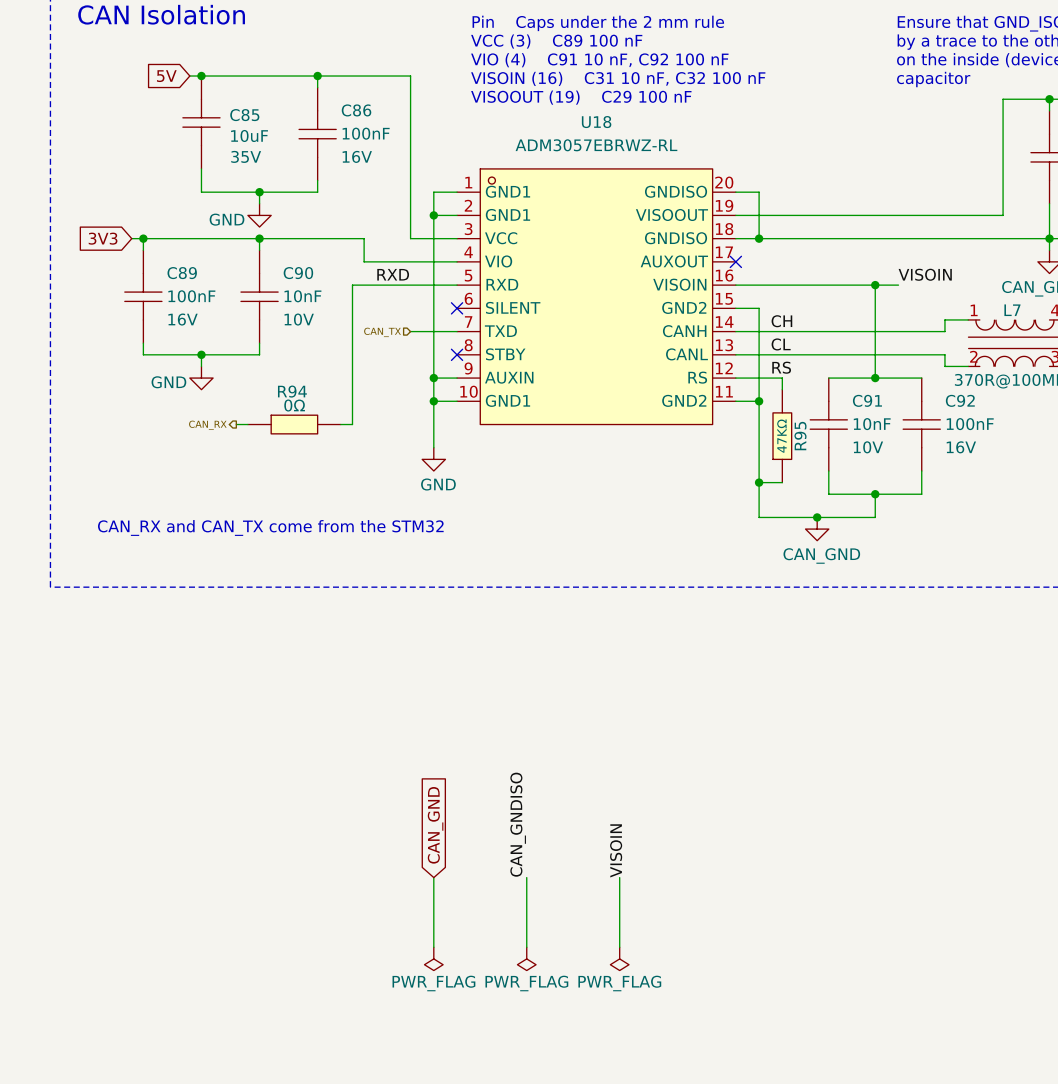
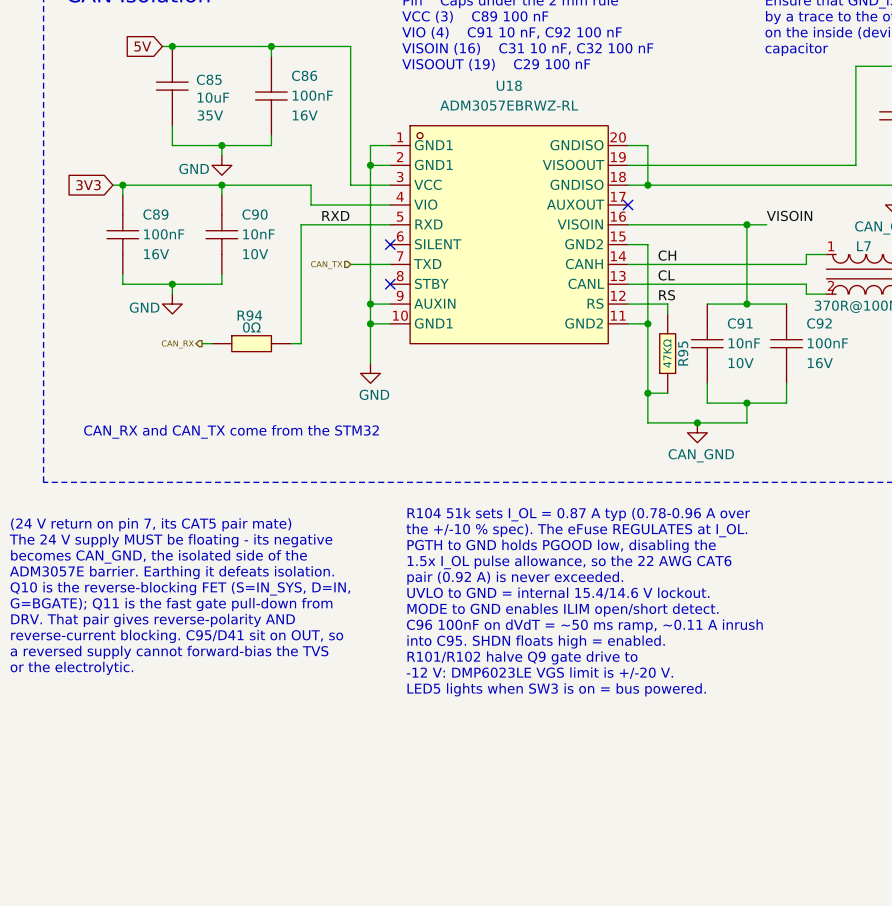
text: none -> R104 51k sets I_OL = 0.87 A typ (0.78-0.96 A over (578, 514)
text: none -> (24 V return on pin 7, its CAT5 pair mate) (151, 524)
text: none -> the +/-10 % spec). The eFuse REGULATES at I_OL. (576, 530)
text: none -> The 24 V supply MUST be floating - its negative (171, 540)
text: none -> PGTH to GND holds PGOOD low, disabling the (561, 546)
text: none -> becomes CAN_GND, the isolated side of the (158, 556)
text: none -> 1.5x I_OL pulse allowance, so the 22 AWG CAT6 (569, 562)
text: none -> ADM3057E barrier. Earthing it defeats isolation. (171, 572)
text: none -> pair (0.92 A) is never exceeded. (515, 578)
text: none -> Q10 is the reverse-blocking FET (S=IN_SYS, D=IN, (180, 588)
text: none -> UVLO to GND = internal 15.4/14.6 V lockout. (558, 593)
text: none -> G=BGATE); Q11 is the fast gate pull-down from (171, 604)
text: none -> MODE to GND enables ILIM open/short detect. (562, 610)
text: none -> DRV. That pair gives reverse-polarity AND (153, 620)
text: none -> C96 100nF on dVdT = ~50 ms ramp, ~0.11 A inrush (584, 626)
text: none -> reverse-current blocking. C95/D41 sit on OUT, so (177, 636)
text: none -> into C95. SHDN floats high = enabled. (536, 641)
text: none -> a reversed supply cannot forward-bias the TVS (169, 652)
text: none -> R101/R102 halve Q9 gate drive to (522, 657)
text: none -> or the electrolytic. (71, 668)
text: none -> -12 V: DMP6023LE VGS limit is +/-20 V. (539, 673)
label: CAN_GNDISO (518, 824) -> none
global label: CAN_GND (435, 825) -> none
text: none -> LED5 lights when SW3 is on = bus powered. (556, 689)
label: VISOIN (616, 850) -> none
wire: (433, 877) (433, 947) -> none
wire: (526, 877) (526, 947) -> none
wire: (619, 877) (619, 947) -> none
power symbol: PWR_FLAG (433, 958) -> none
power symbol: PWR_FLAG (526, 958) -> none
power symbol: PWR_FLAG (619, 958) -> none

